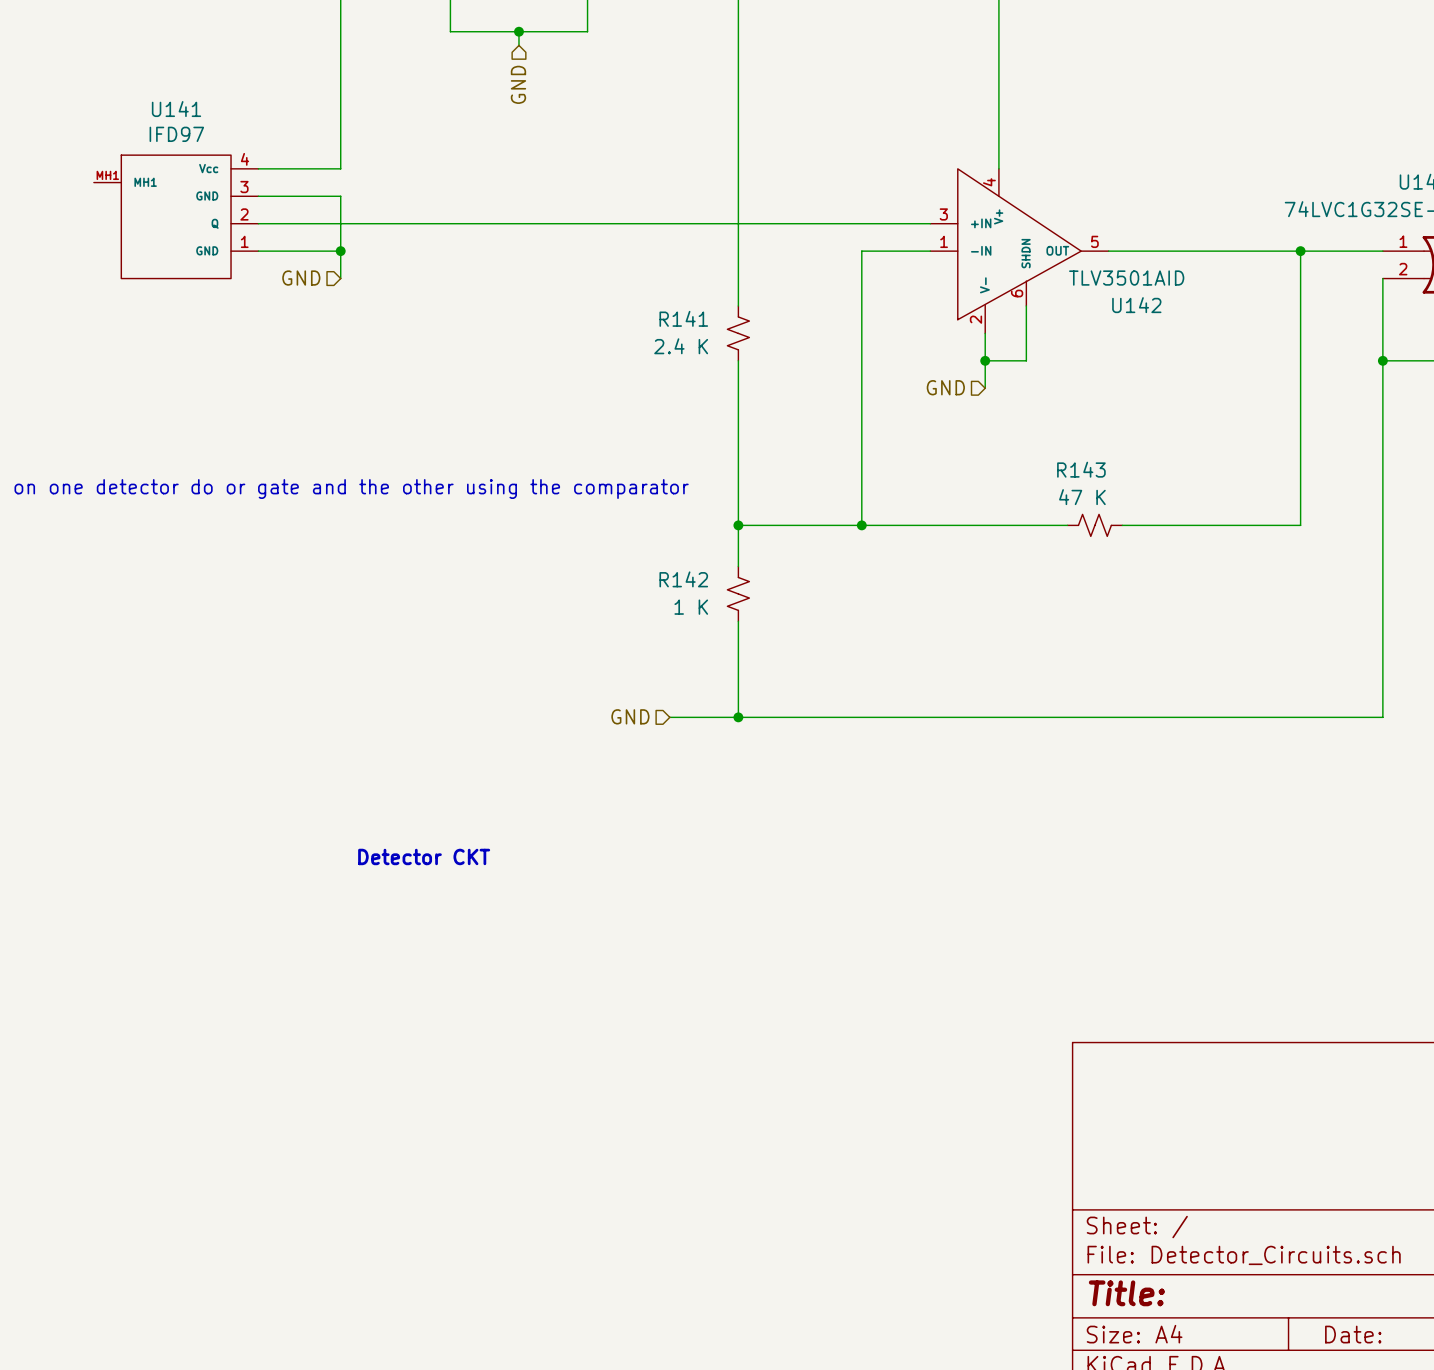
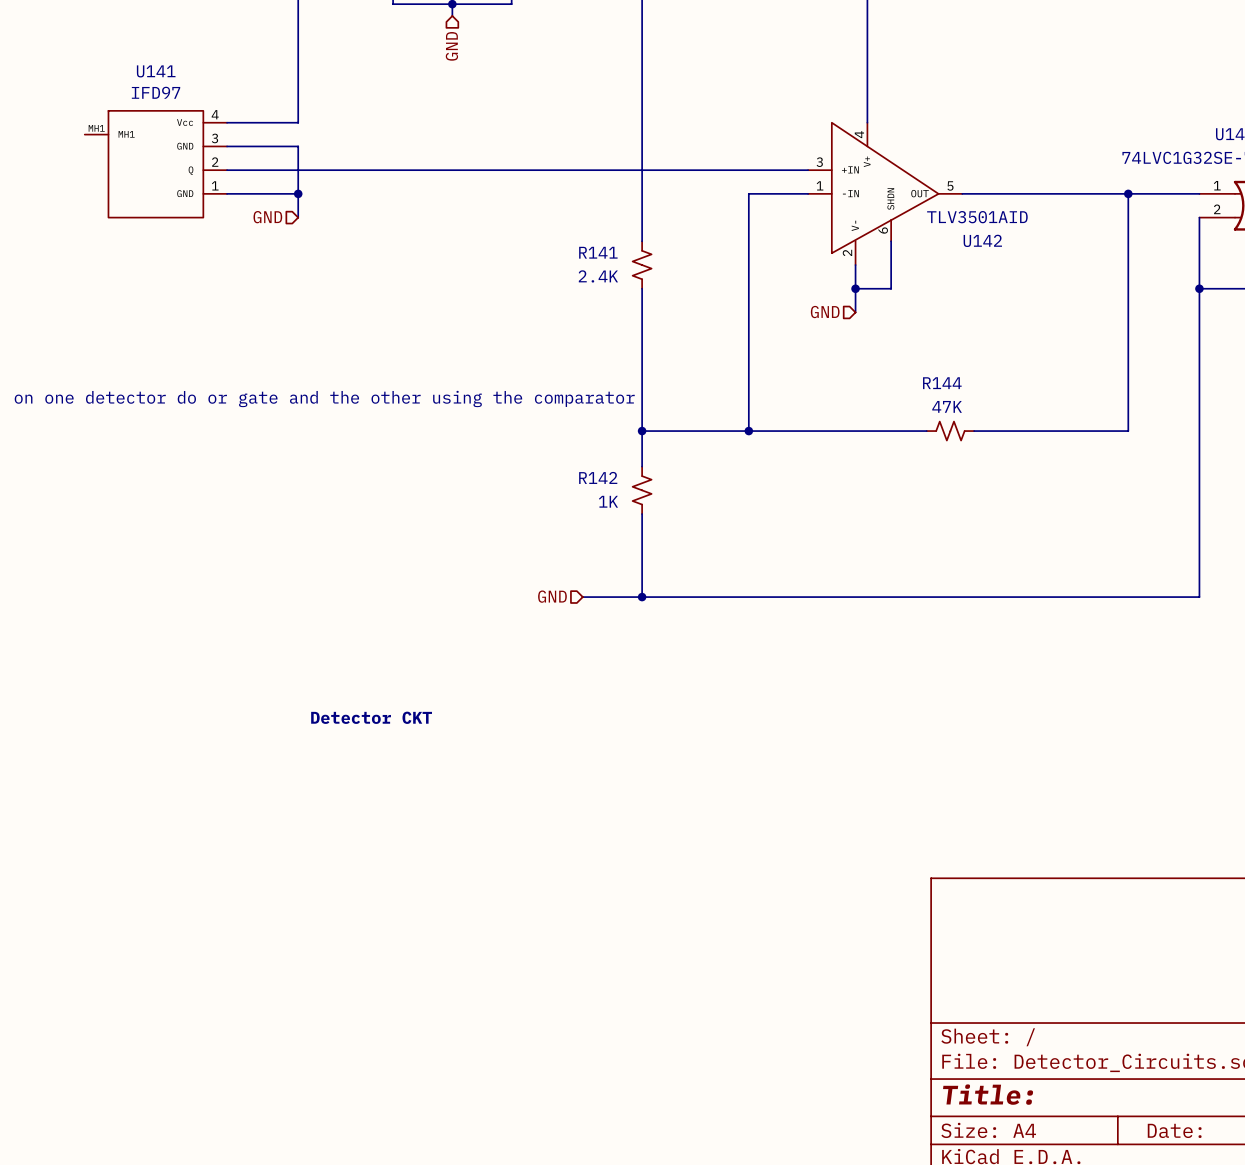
R141 value: 2.4 K (681, 346) -> 2.4K (598, 276)
R143 name: R143 (1081, 469) -> R144 (942, 383)
R143 value: 47 K (1082, 497) -> 47K (947, 406)
R142 value: 1 K (691, 607) -> 1K (608, 501)

